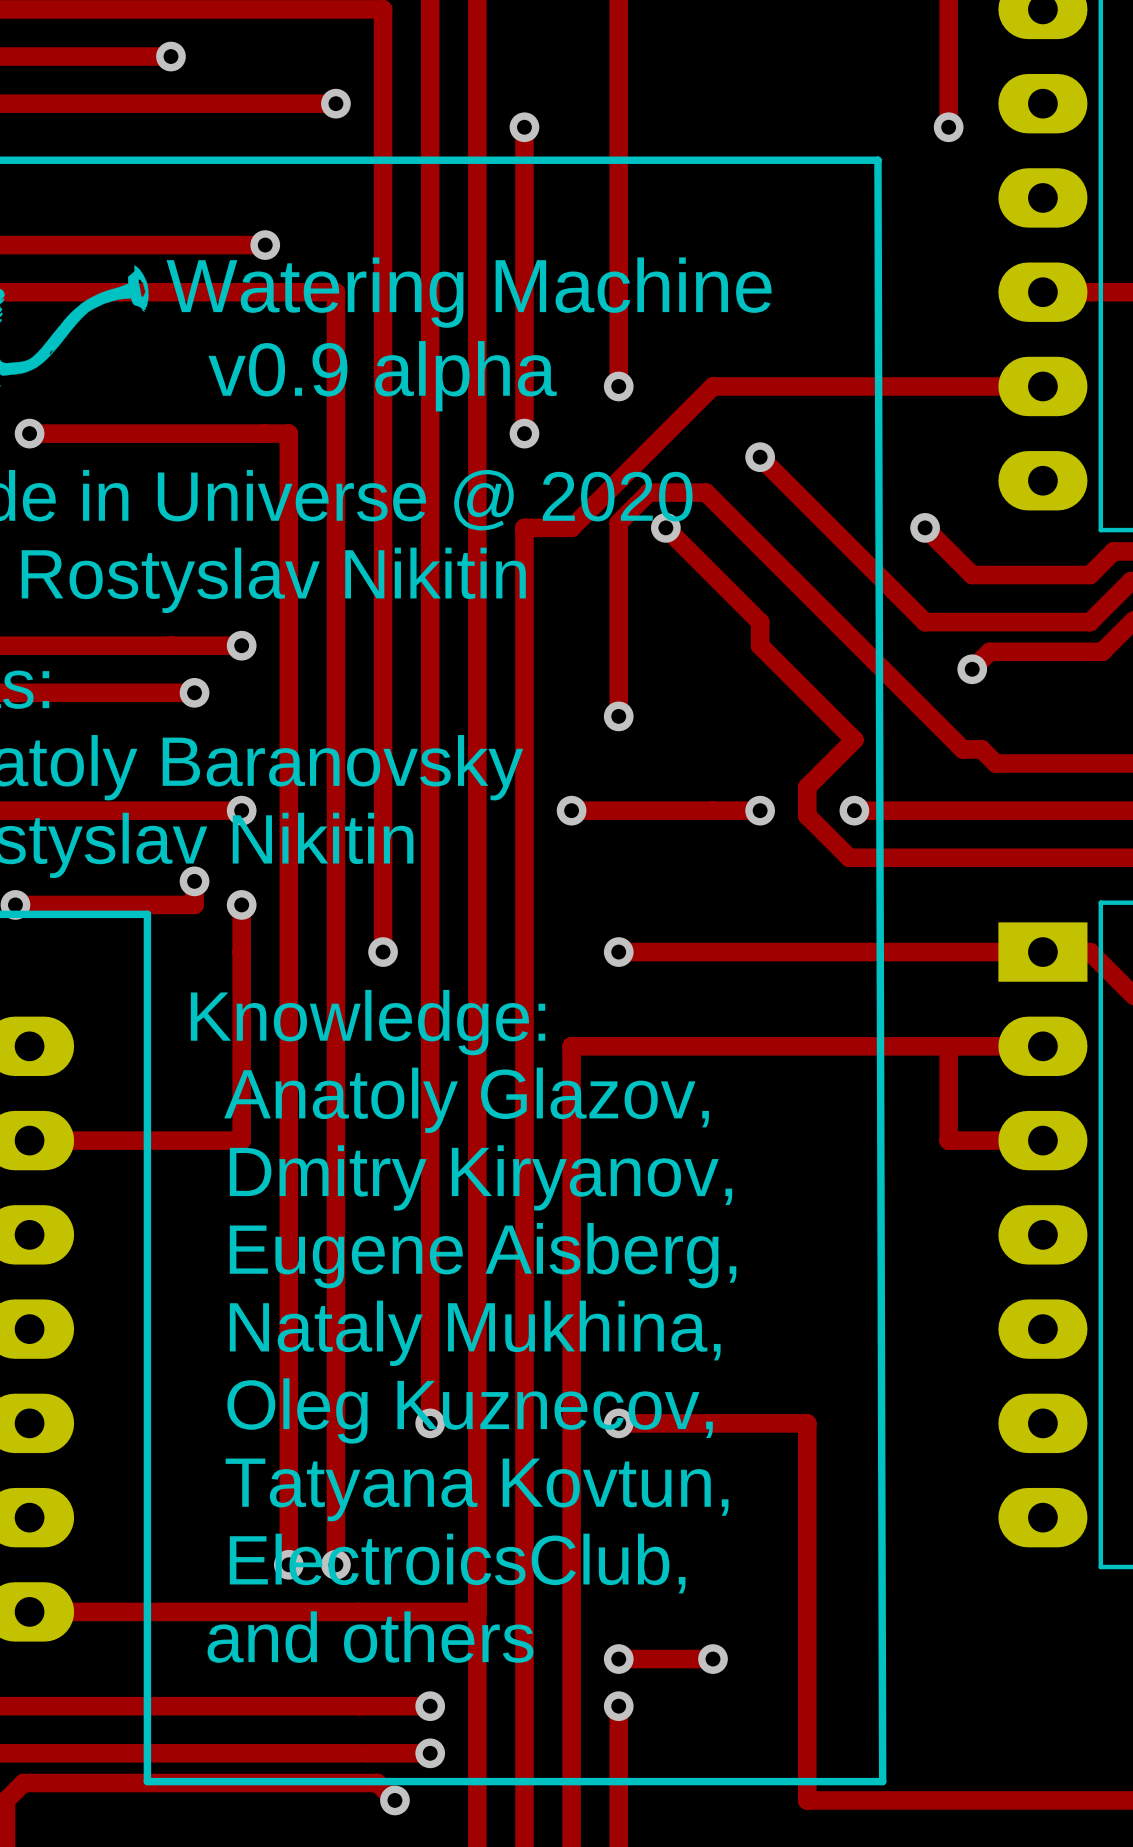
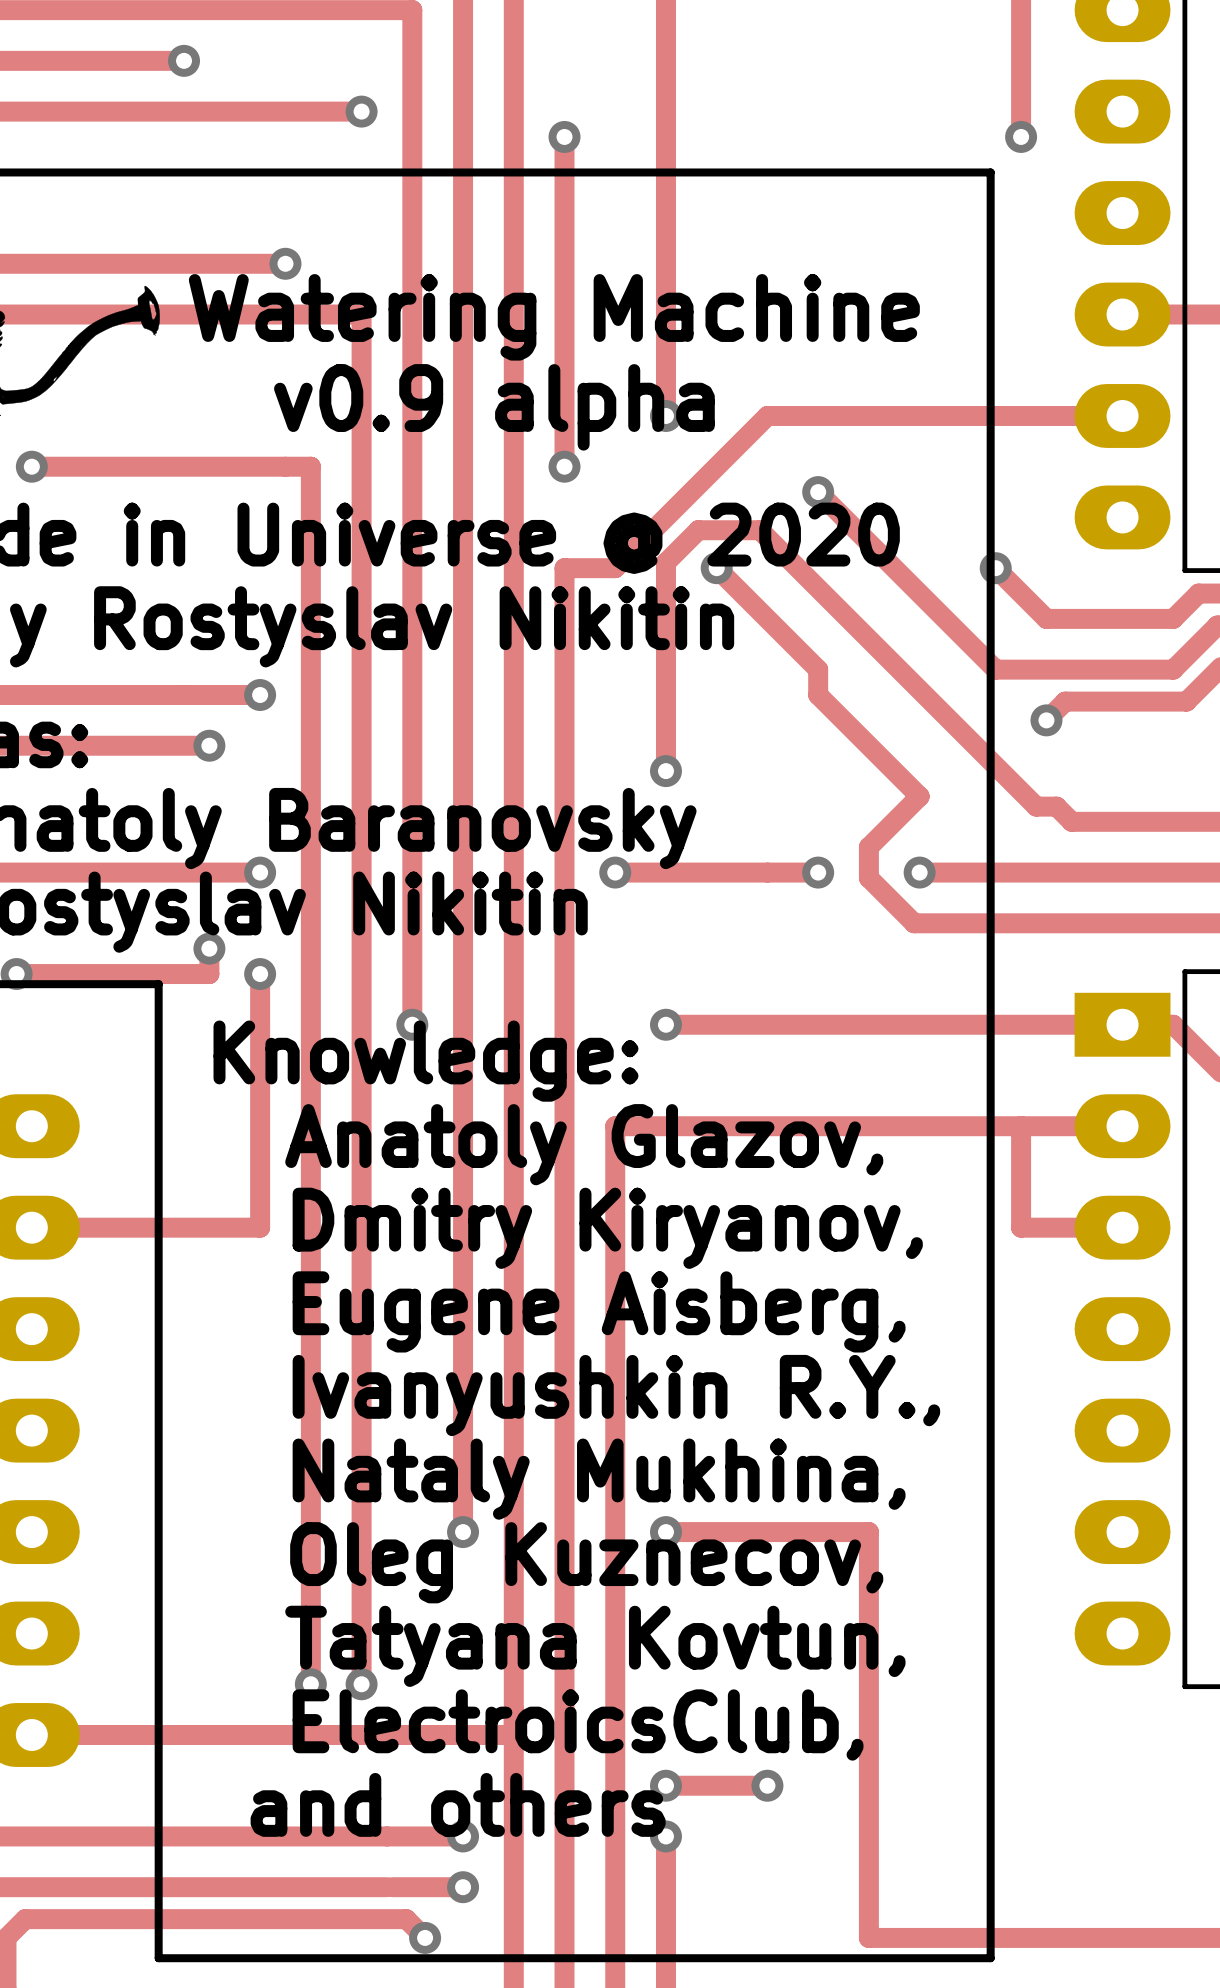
line: (877, 160) (882, 1781) (147, 1781) -> (945, 172) (990, 172) (990, 1958) (158, 1958) (158, 1917)
text position: Knowledge: (368, 1022) -> Knowledge: (425, 1061)
text position: Anatoly Glazov, (466, 1100) -> Anatoly Glazov, (584, 1144)
text position: Dmitry Kiryanov, (480, 1177) -> Dmitry Kiryanov, (607, 1228)
text position: Eugene Aisberg, (483, 1255) -> Eugene Aisberg, (599, 1311)
text: none -> Ivanyushkin R.Y., (616, 1395)
text position: Nataly Mukhina, (475, 1333) -> Nataly Mukhina, (599, 1479)
text position: Oleg Kuznecov, (470, 1410) -> Oleg Kuznecov, (586, 1562)
text position: Tatyana Kovtun, (477, 1489) -> Tatyana Kovtun, (595, 1646)
text position: ElectroicsClub, (457, 1563) -> ElectroicsClub, (578, 1725)
text position: and others (370, 1637) -> and others (458, 1804)

